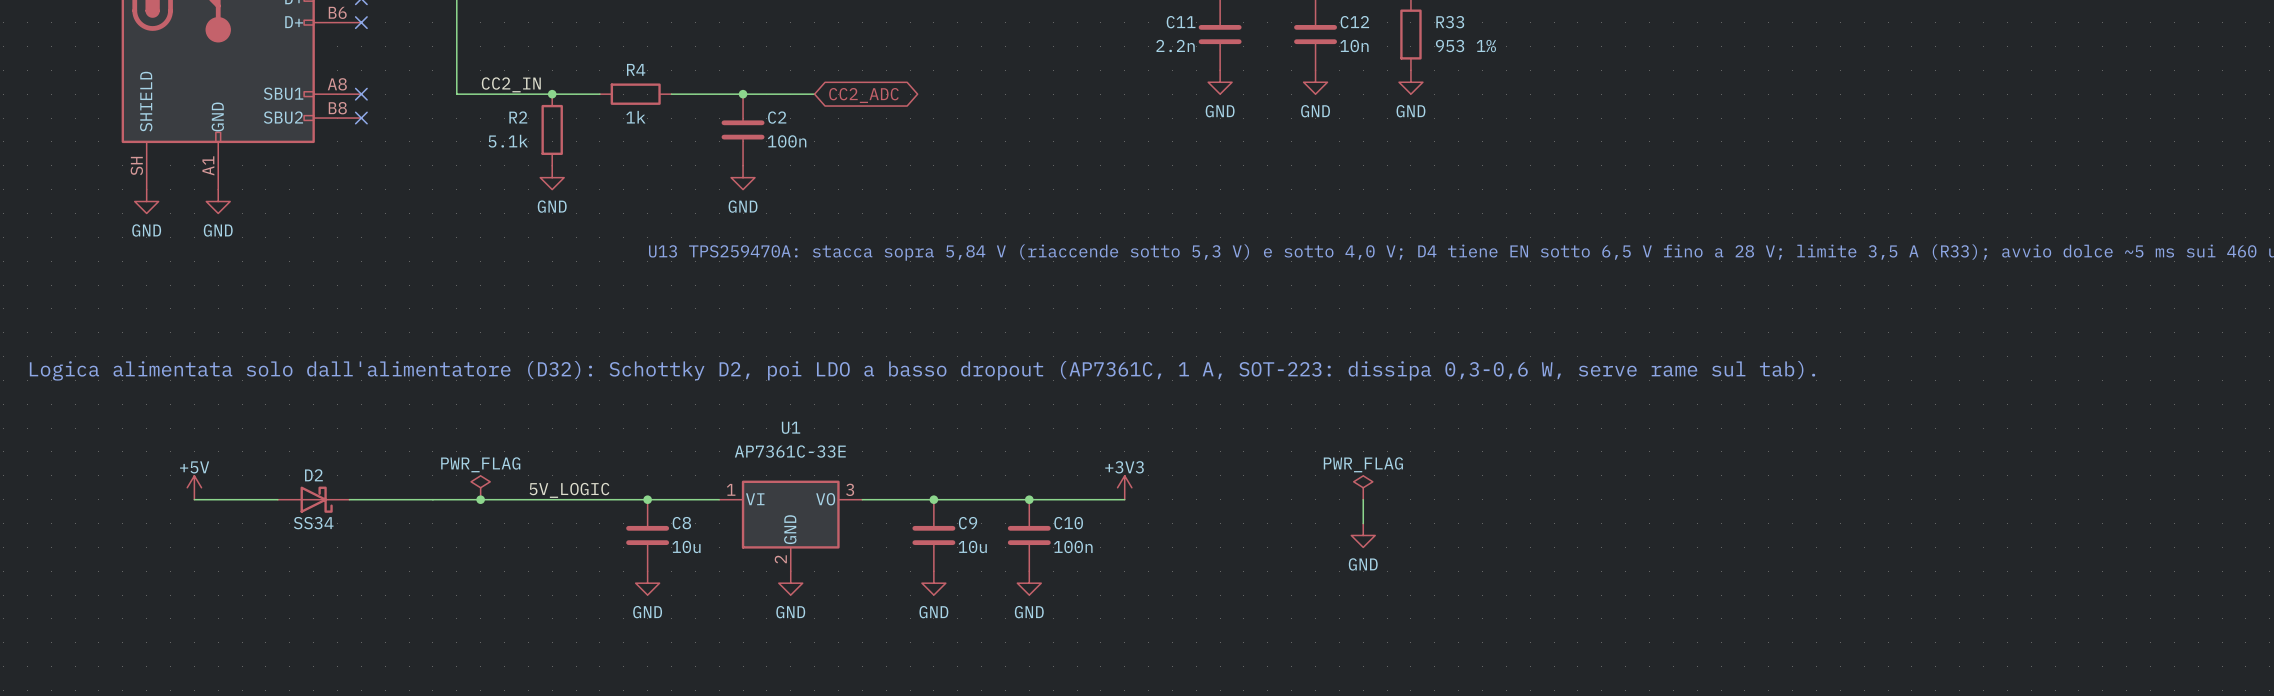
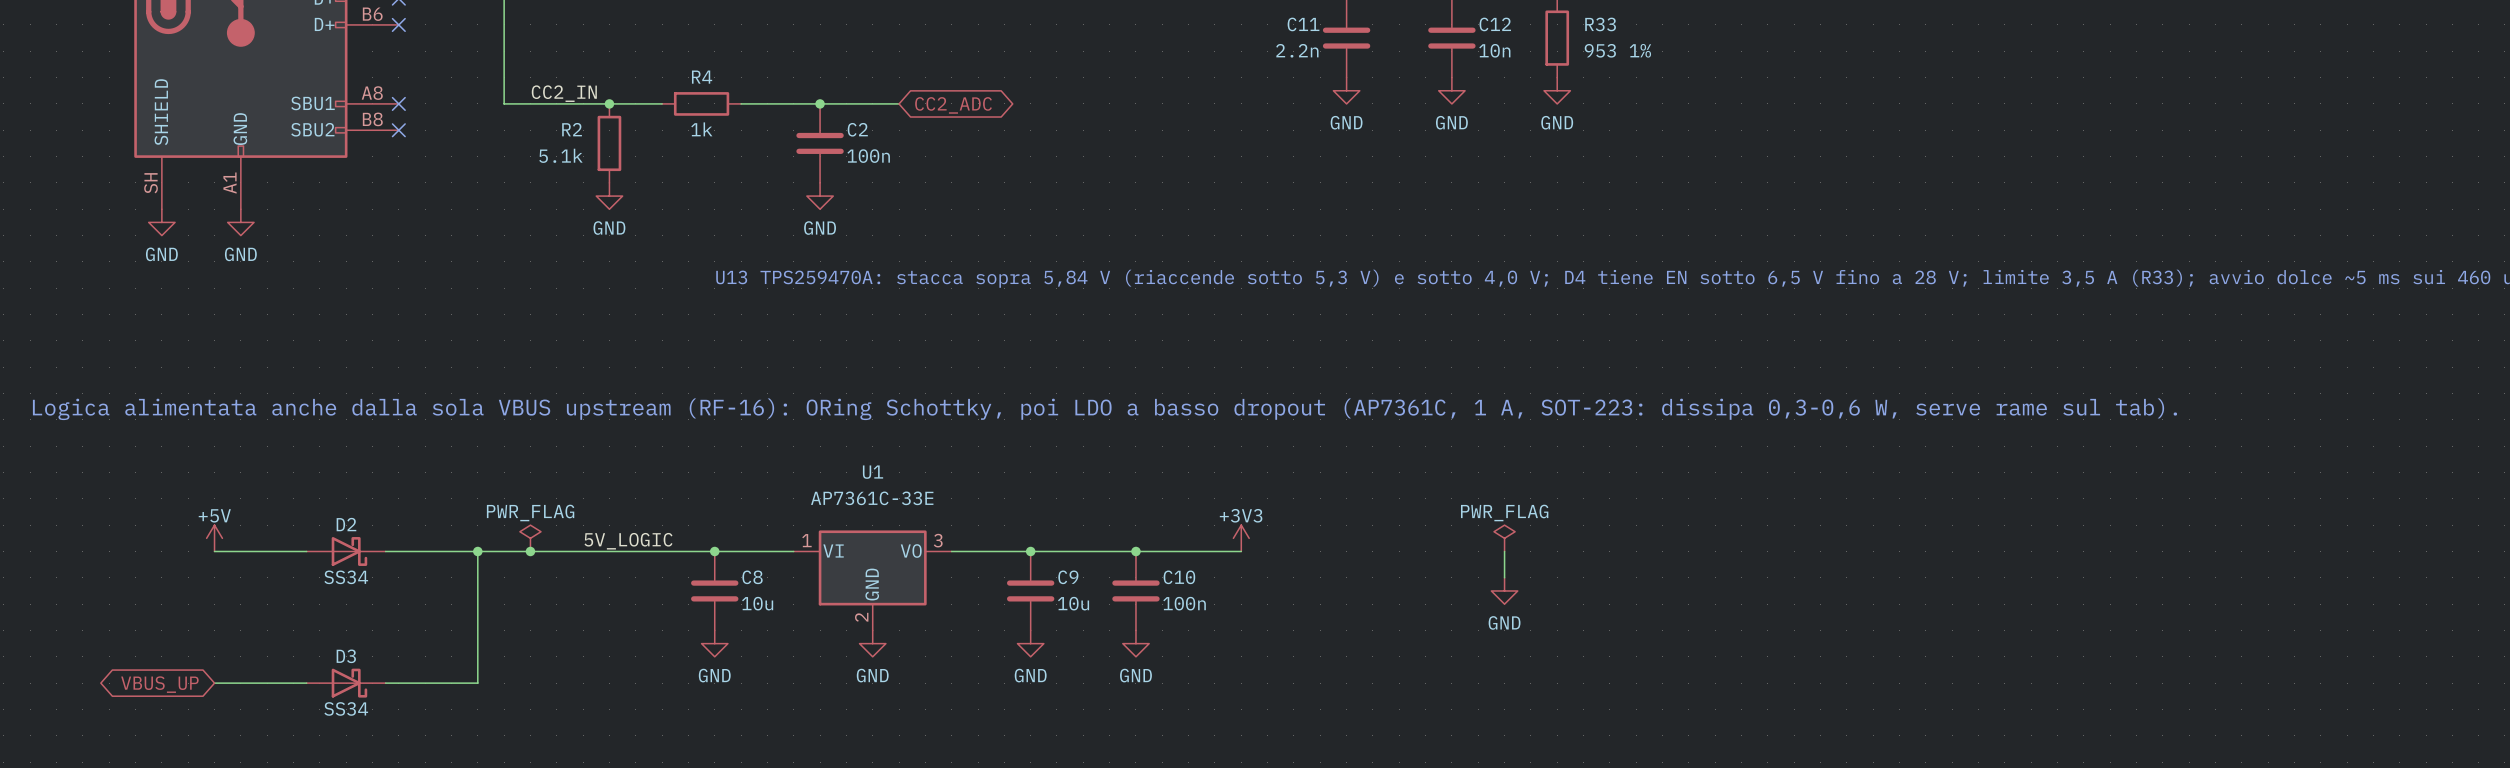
text: Logica alimentata solo dall'alimentatore (D32): Schottky D2, poi LDO a basso dropout (AP7361C, 1 A, SOT-223: dissipa 0,3-0,6 W, serve rame sul tab). (922, 370) -> Logica alimentata anche dalla sola VBUS upstream (RF-16): ORing Schottky, poi LDO a basso dropout (AP7361C, 1 A, SOT-223: dissipa 0,3-0,6 W, serve rame sul tab). (1104, 409)
wire: none -> (477, 551) (477, 683) (385, 683)
junction: none -> (477, 551)
wire: none -> (214, 683) (306, 683)
D3: none -> SS34 (346, 683)
global label: none -> VBUS_UP (159, 684)

